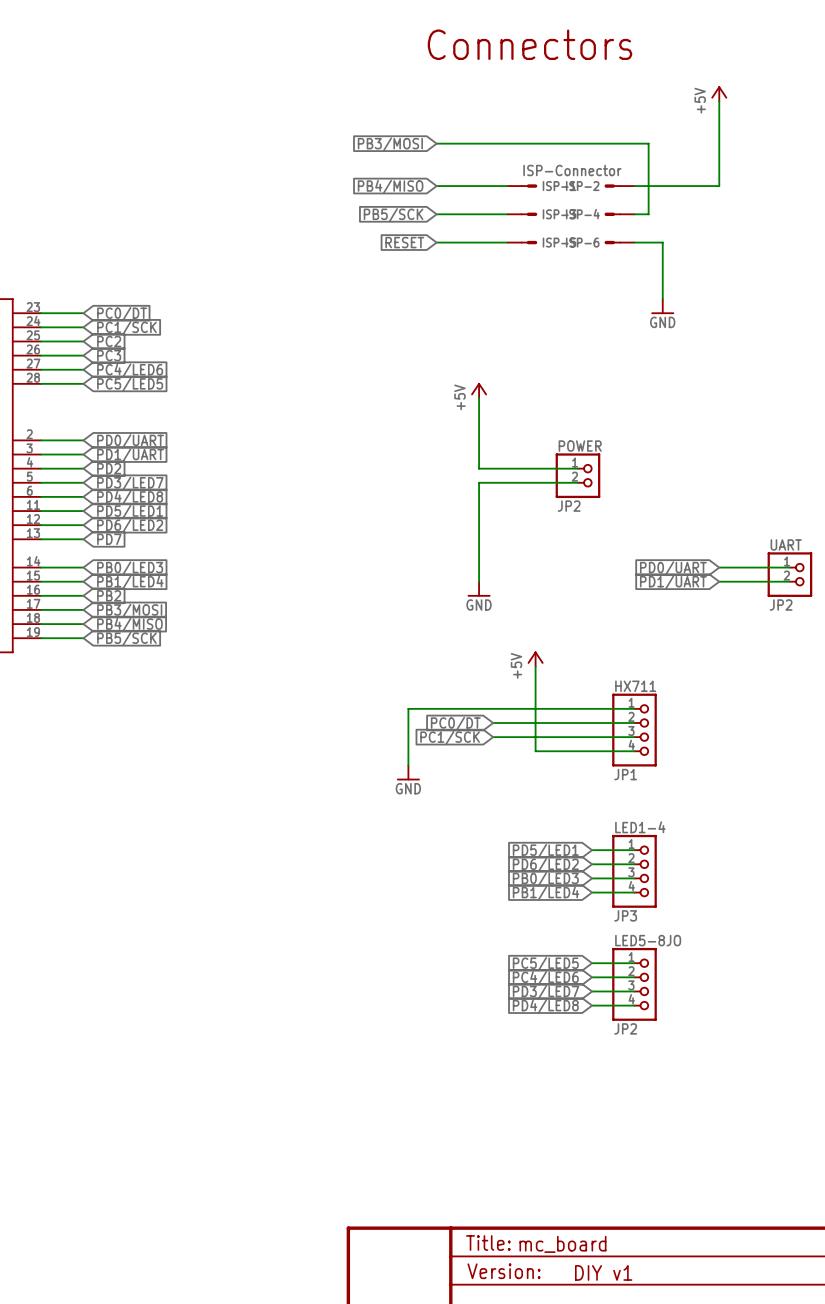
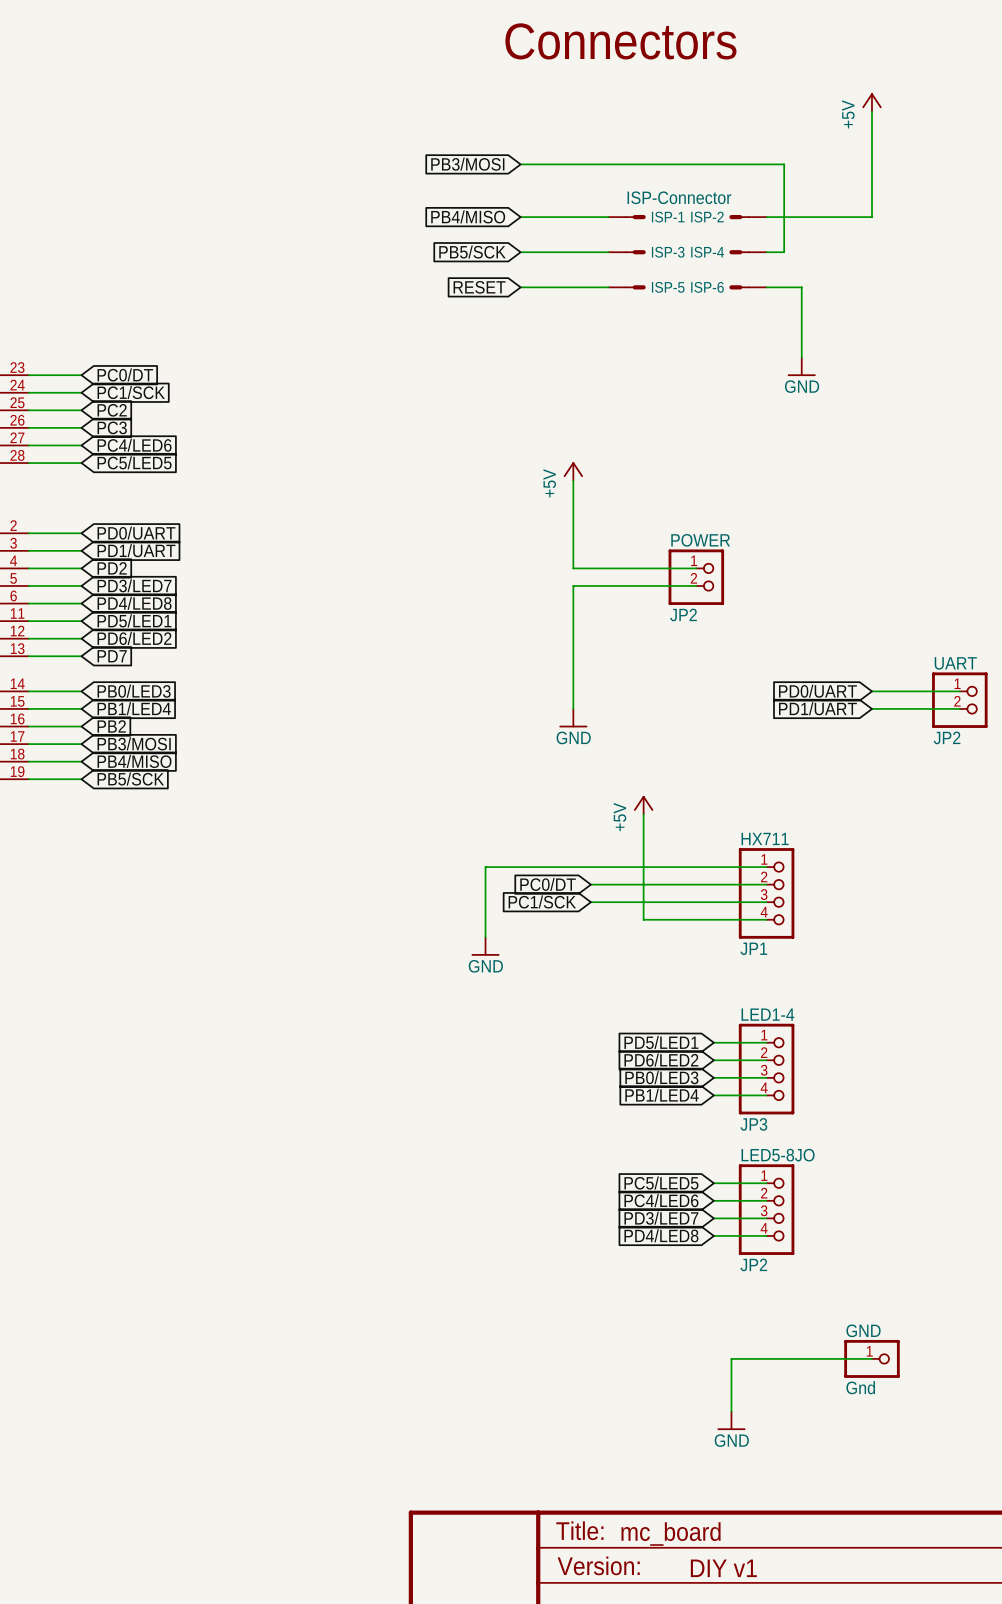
wire: none -> (871, 1358) (731, 1358) (731, 1411)
GND: none -> Gnd (871, 1358)
power symbol: none -> GND (731, 1420)

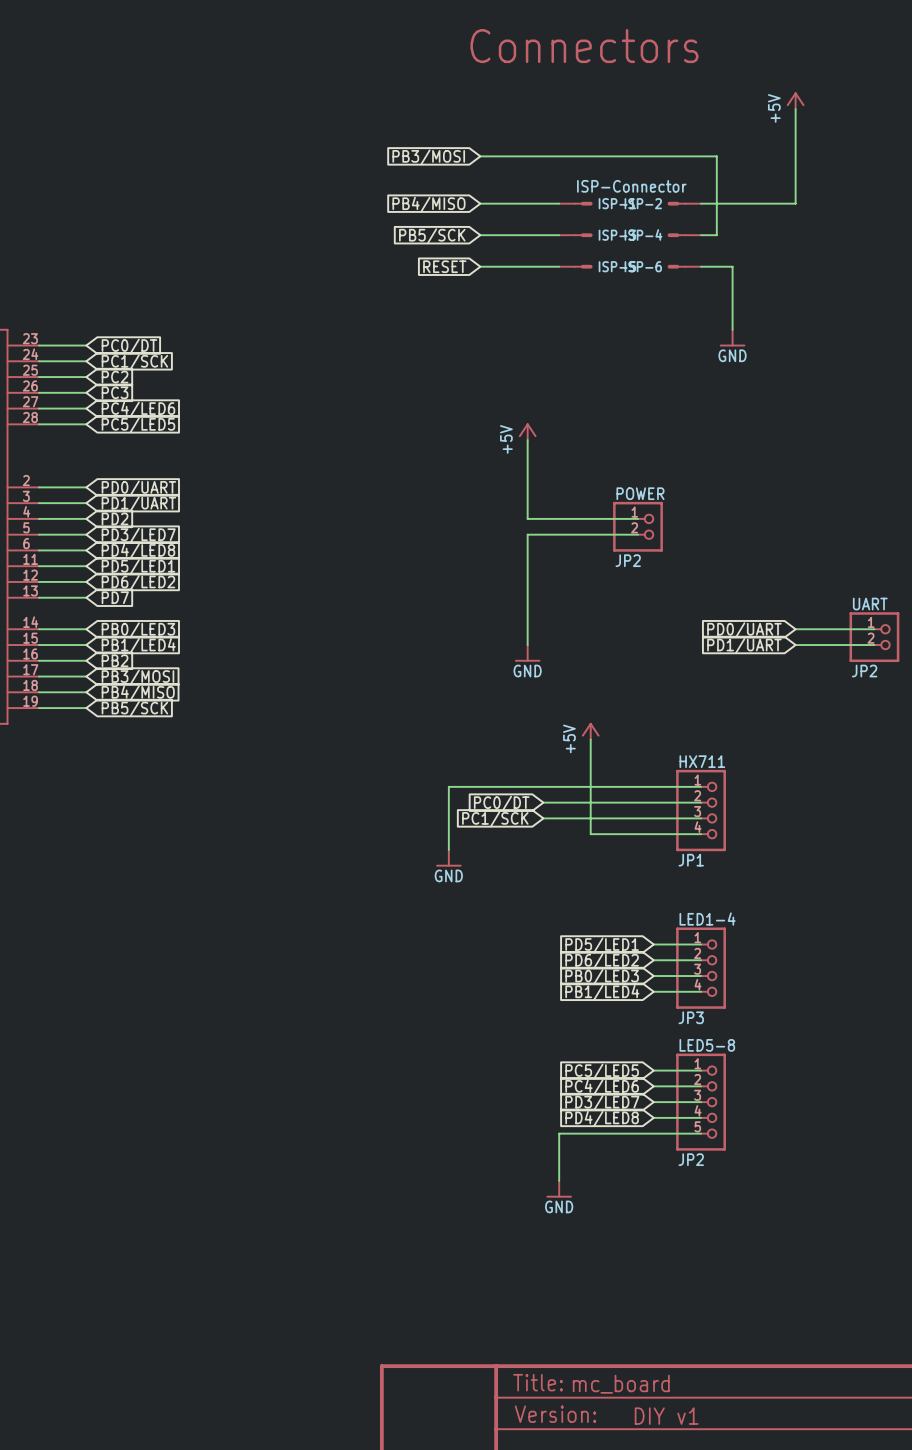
LED5-8JO: JP2 (766, 1209) -> none
LED5-8: none -> JP2 (701, 1102)
wire: none -> (701, 1133) (559, 1133) (559, 1180)
wire: (871, 1358) (731, 1358) (731, 1411) -> none
GND: Gnd (871, 1358) -> none
power symbol position: GND (731, 1420) -> GND (559, 1189)

